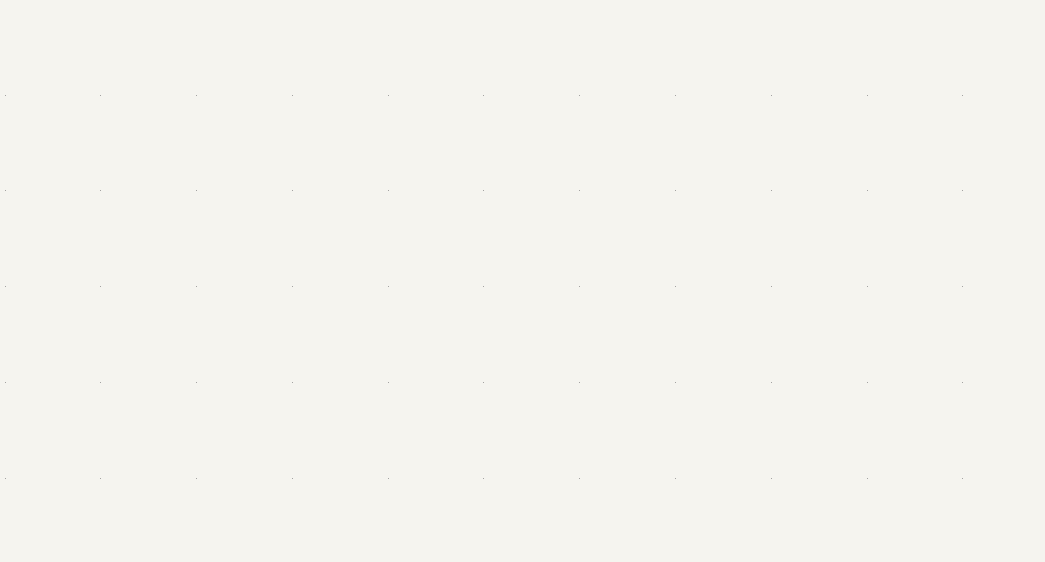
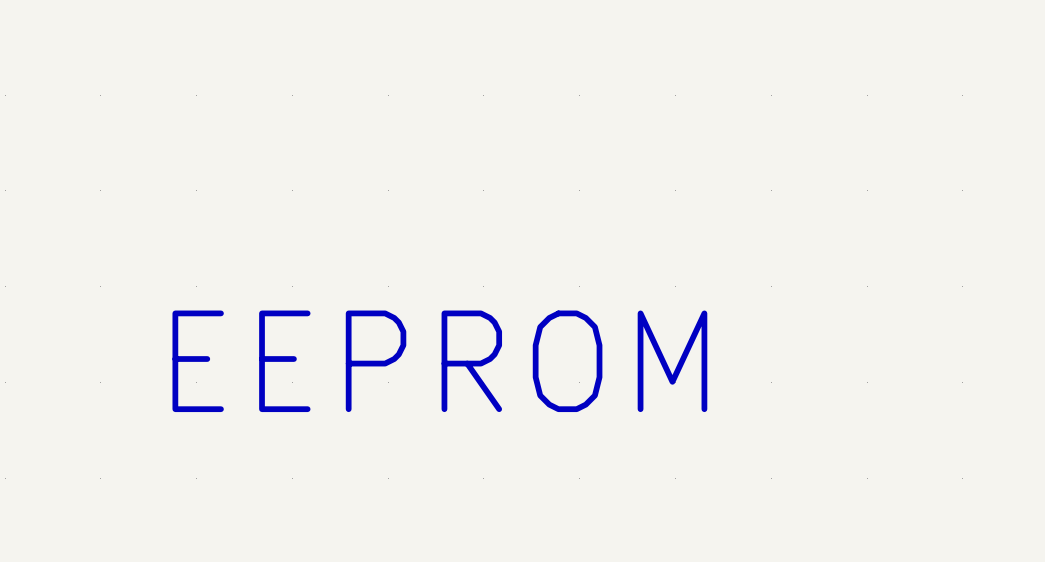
text: none -> EEPROM (439, 361)

